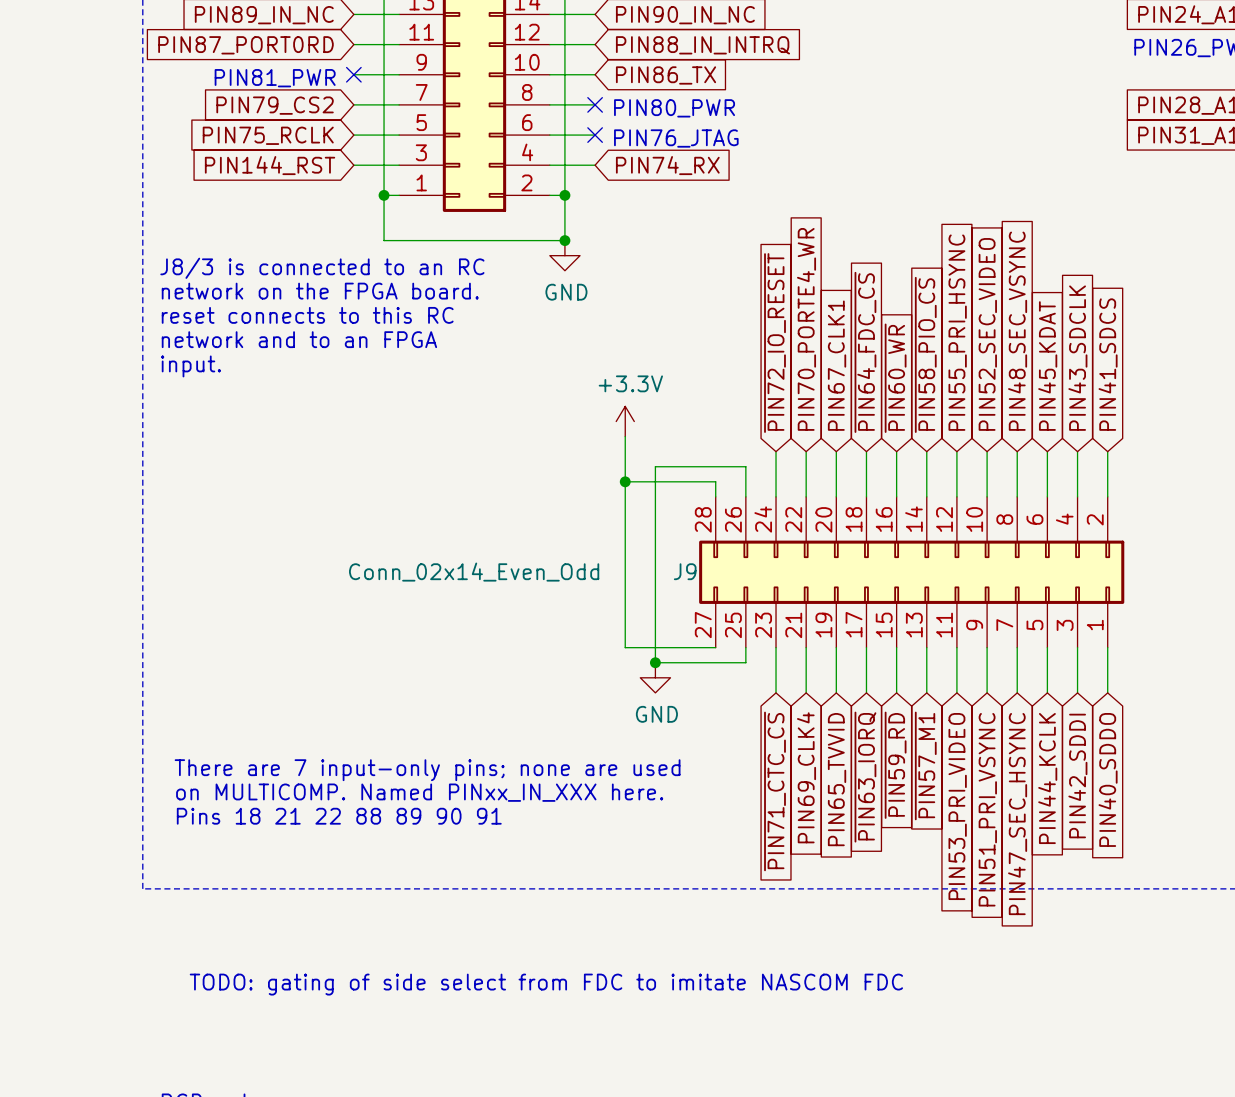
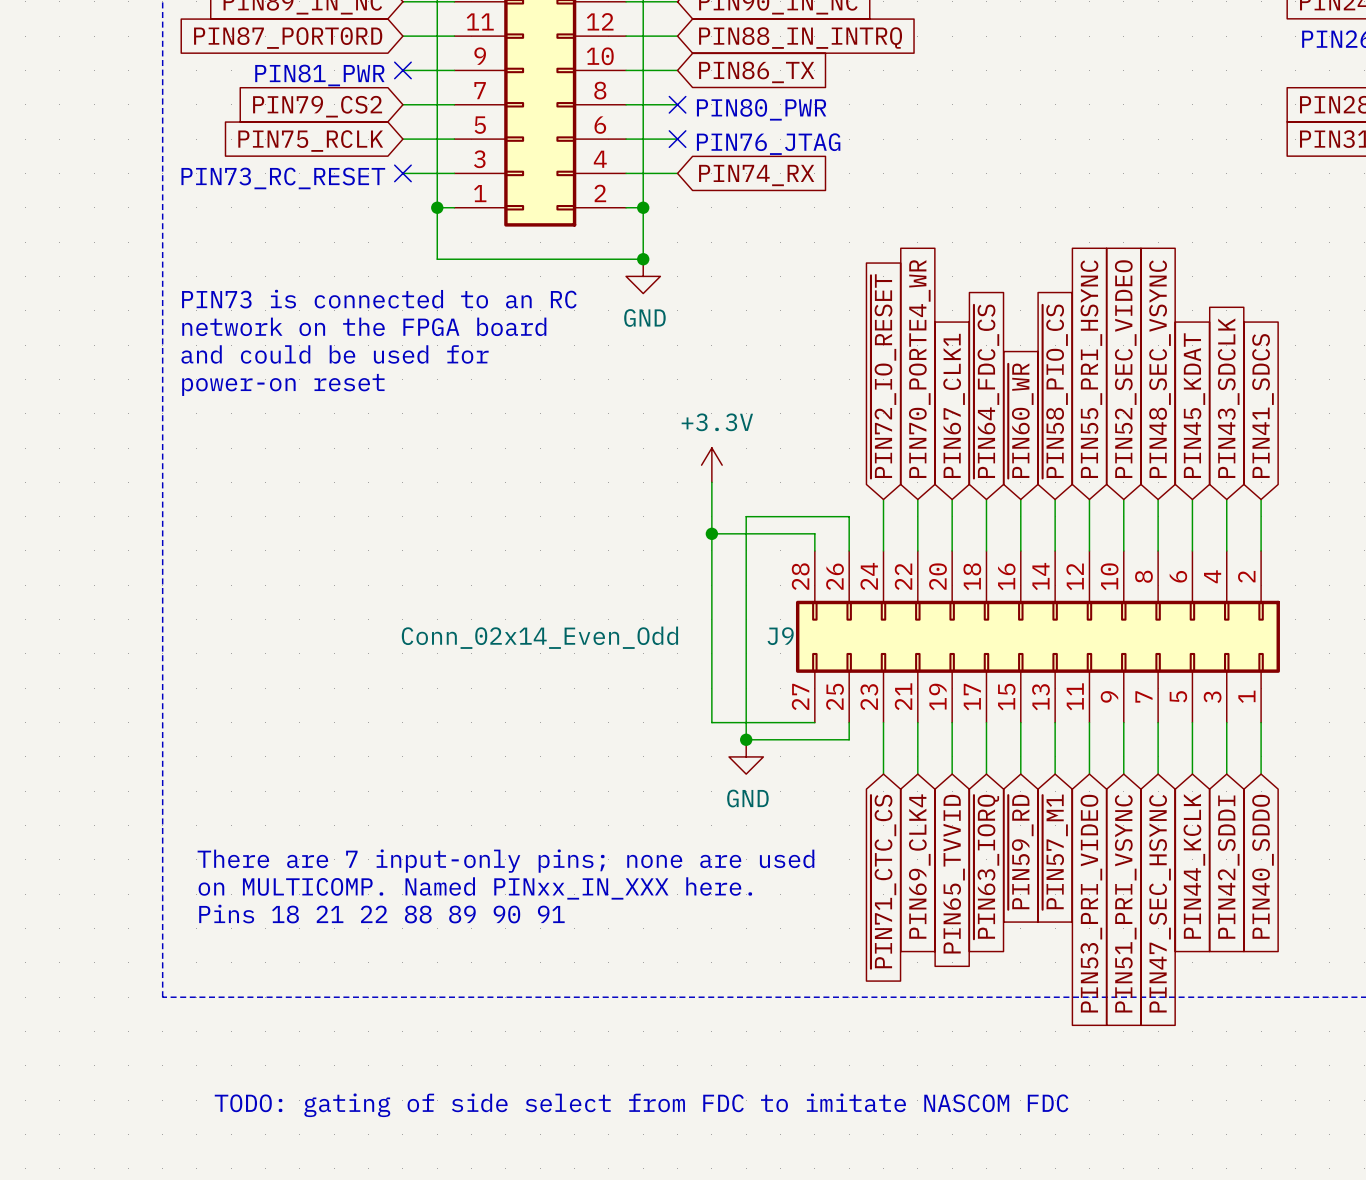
global label: PIN144_RST (270, 165) -> none
no-connect mark: none -> (402, 173)
text: none -> PIN73_RC_RESET (283, 178)
text: J8/3 is connected to an RC (322, 268) -> PIN73 is connected to an RC (379, 299)
text: network on the FPGA board. (320, 291) -> network on the FPGA board (364, 326)
text: reset connects to this RC (307, 315) -> none
text: none -> and could be used for (335, 354)
text: network and to an FPGA (299, 339) -> none
text: none -> power-on reset (283, 384)
text: input. (191, 366) -> none

